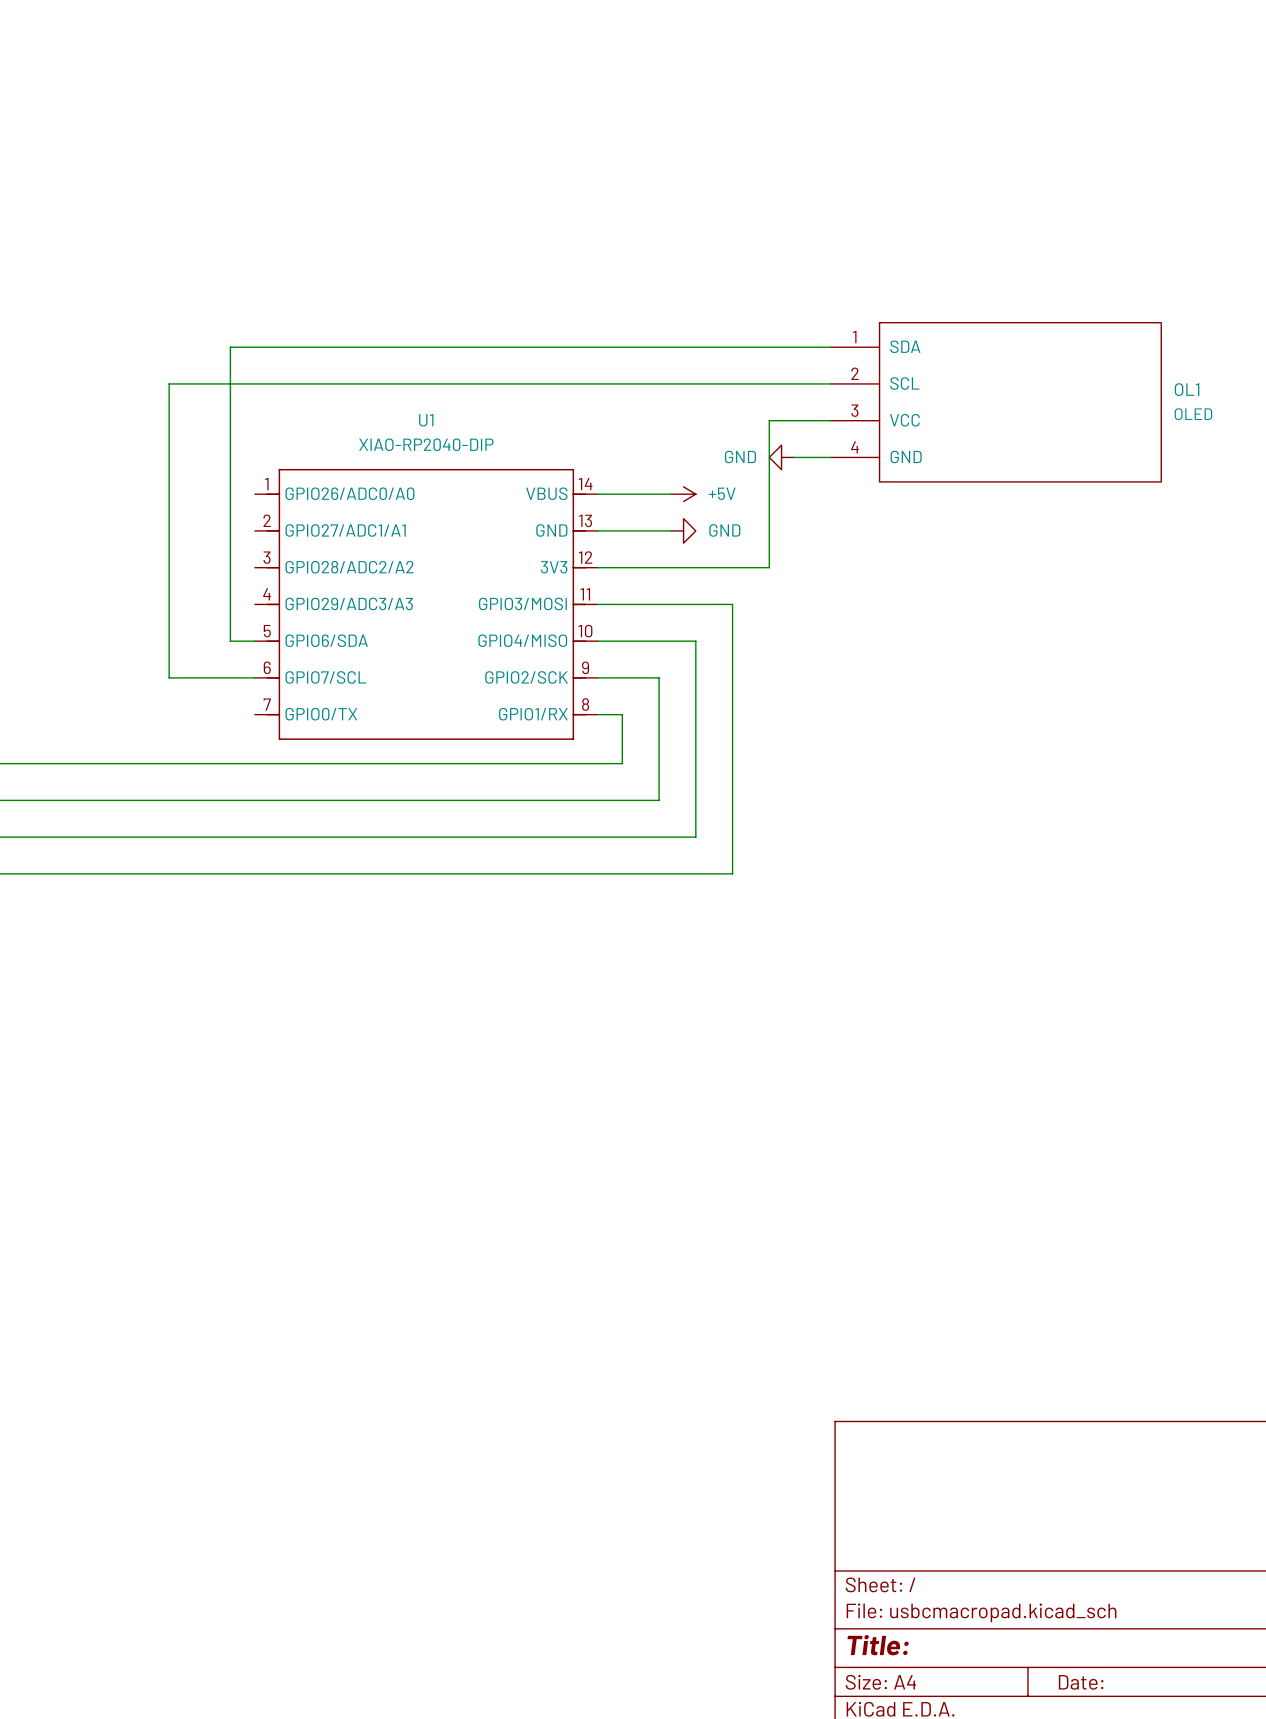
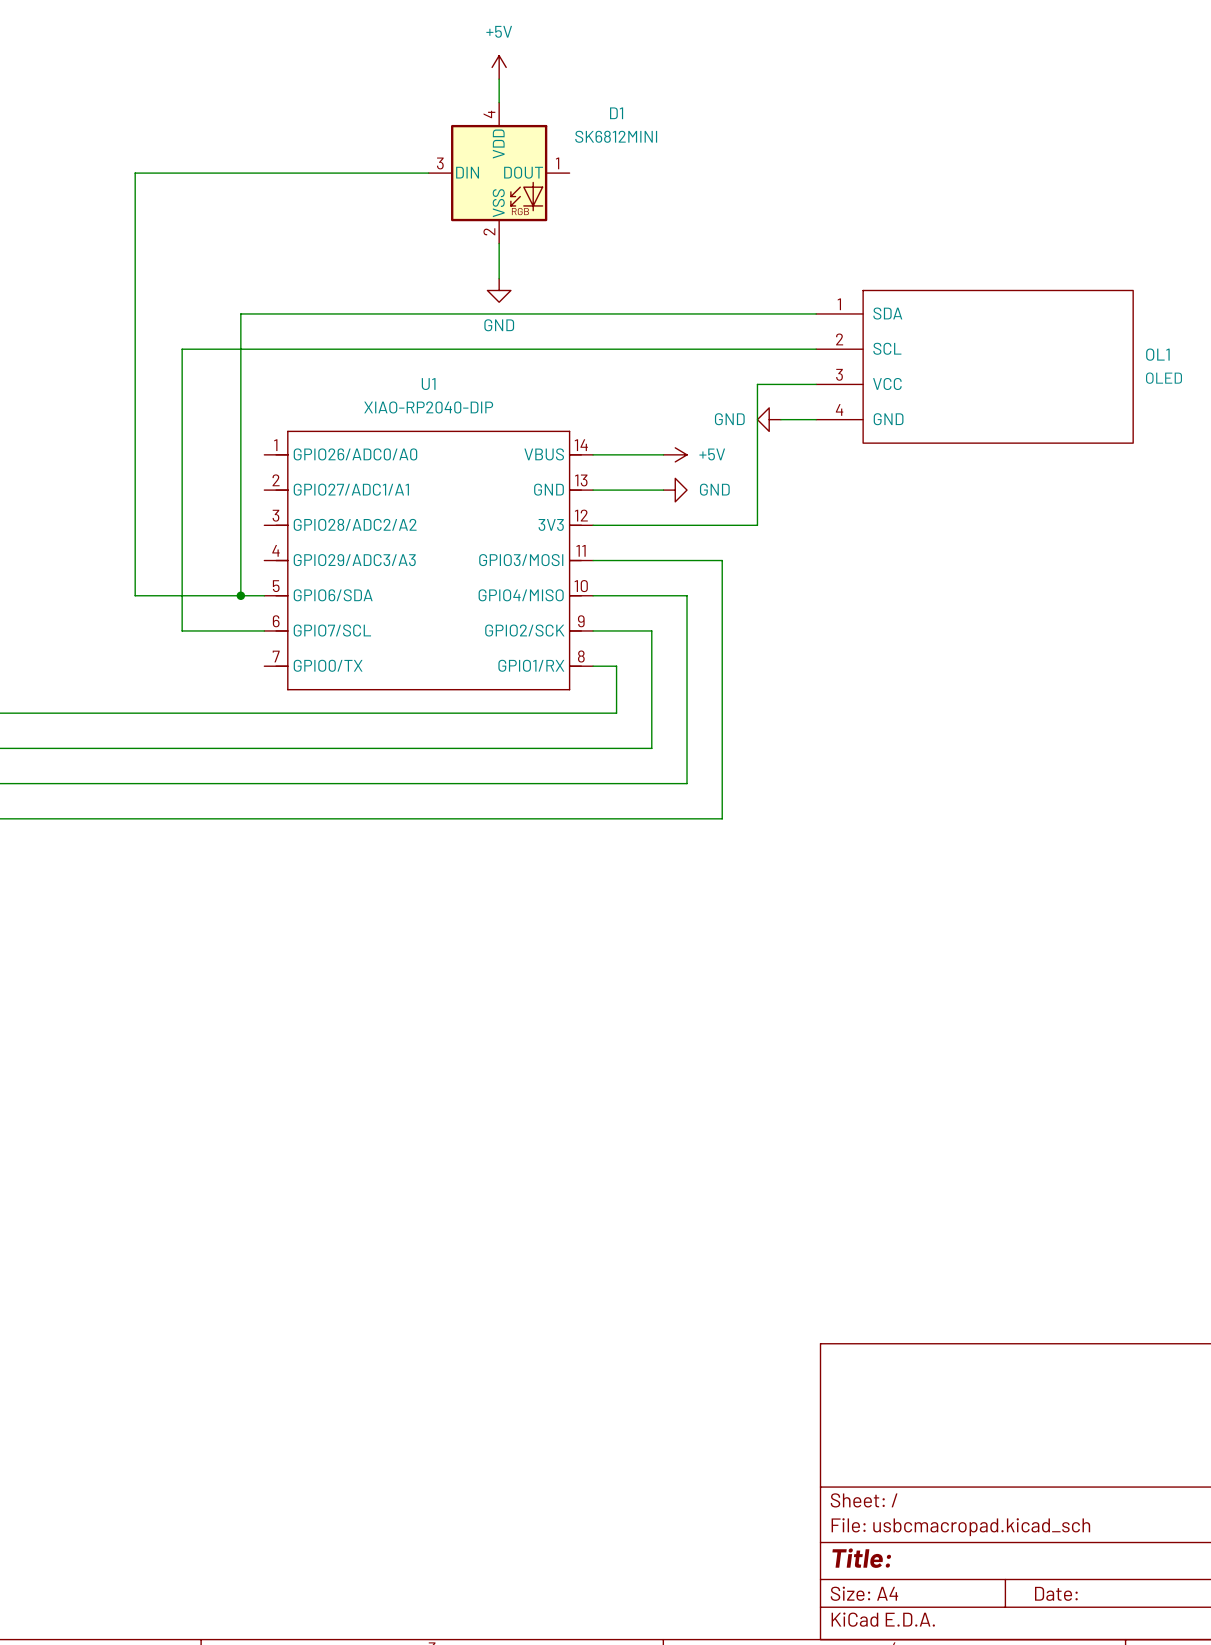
power symbol: none -> +5V (499, 67)
wire: none -> (499, 79) (499, 102)
wire: none -> (428, 173) (135, 173) (135, 595) (240, 595)
D1: none -> SK6812MINI (499, 173)
wire: none -> (499, 243) (499, 278)
power symbol: none -> GND (499, 290)
junction: none -> (240, 595)

